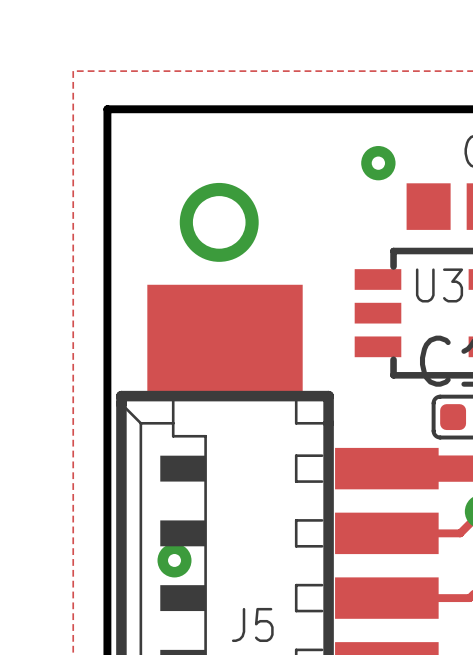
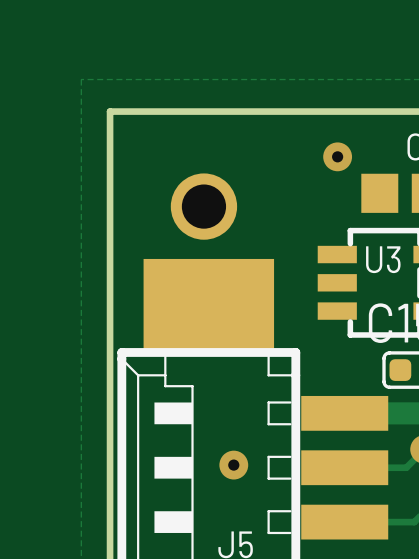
via: none -> (233, 465)
via: (174, 560) -> none

